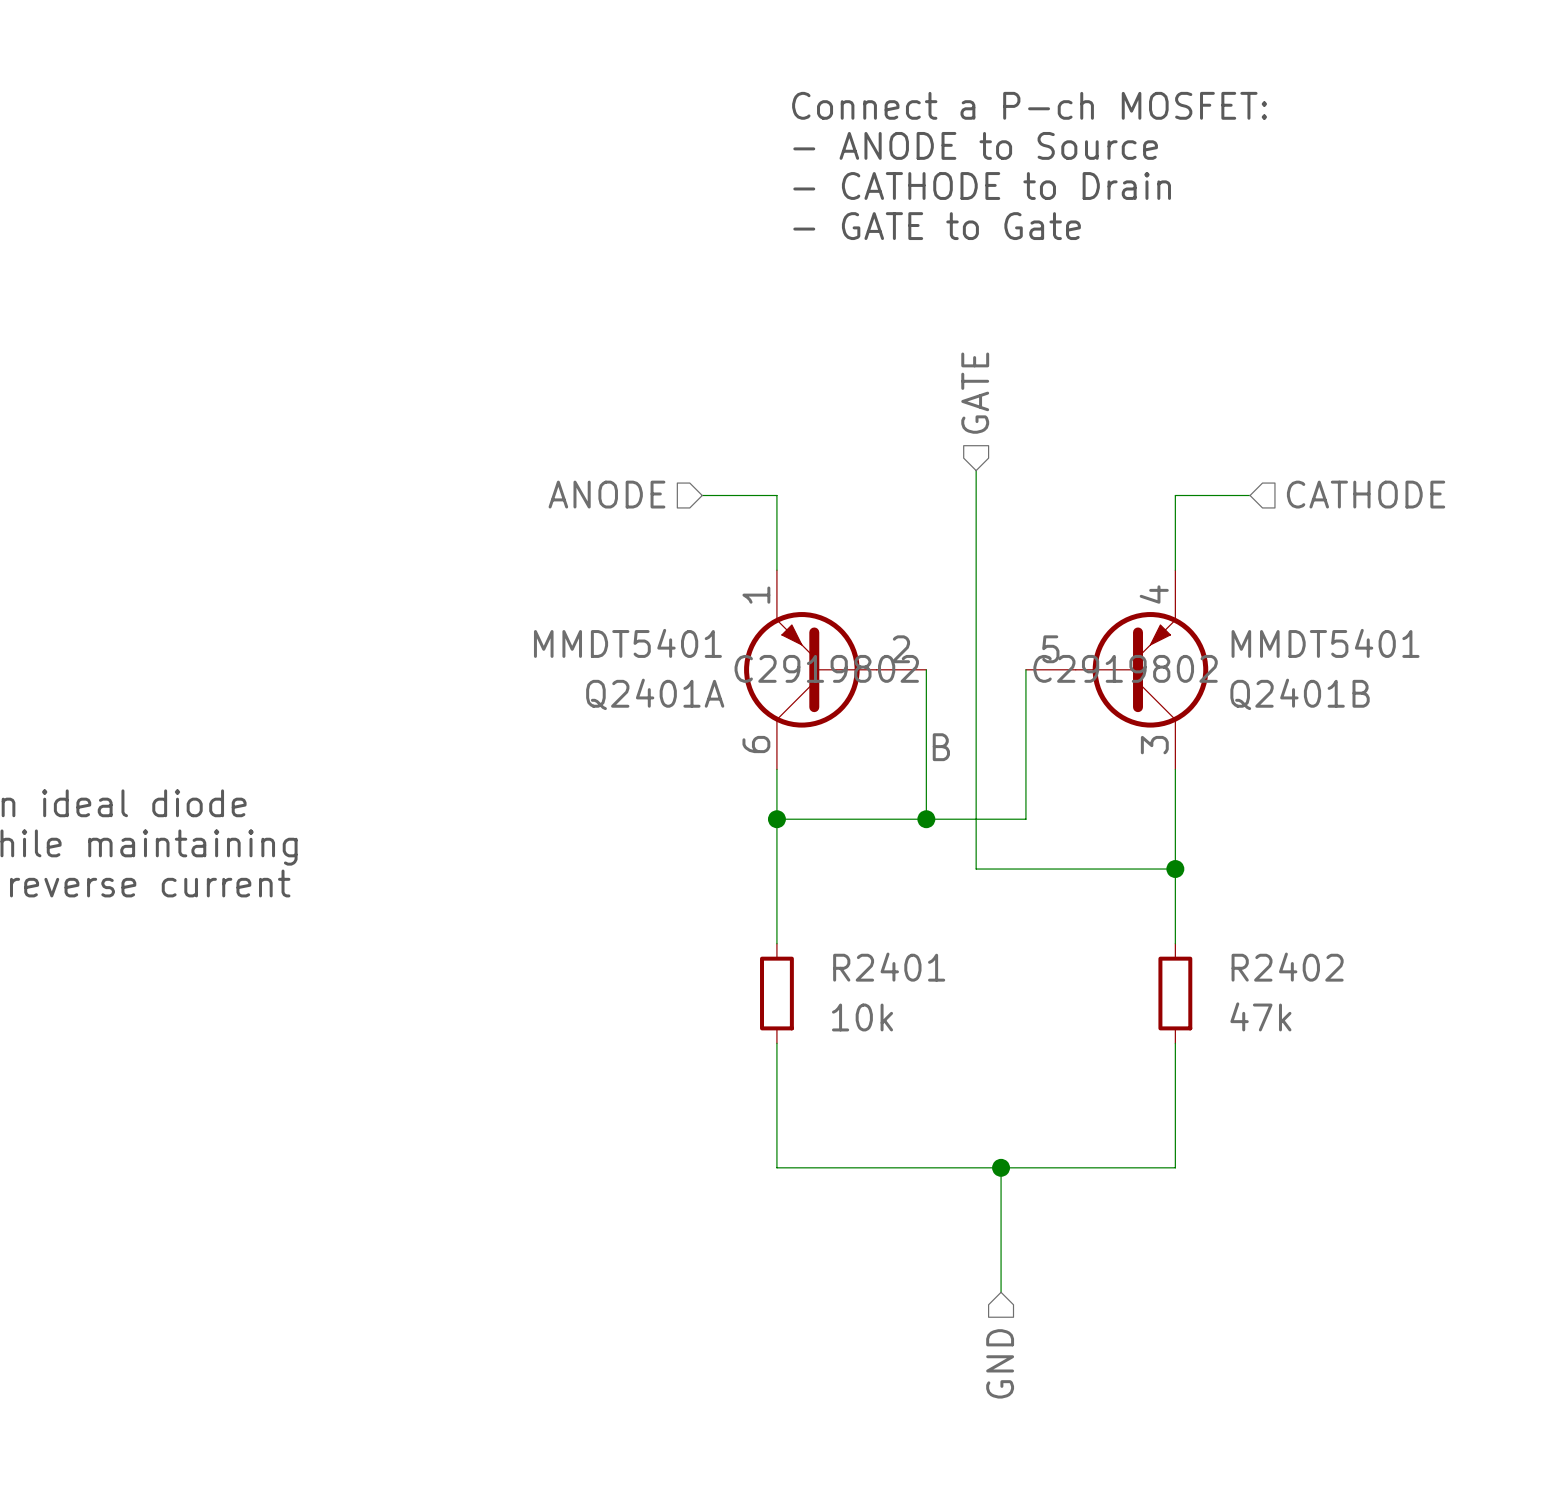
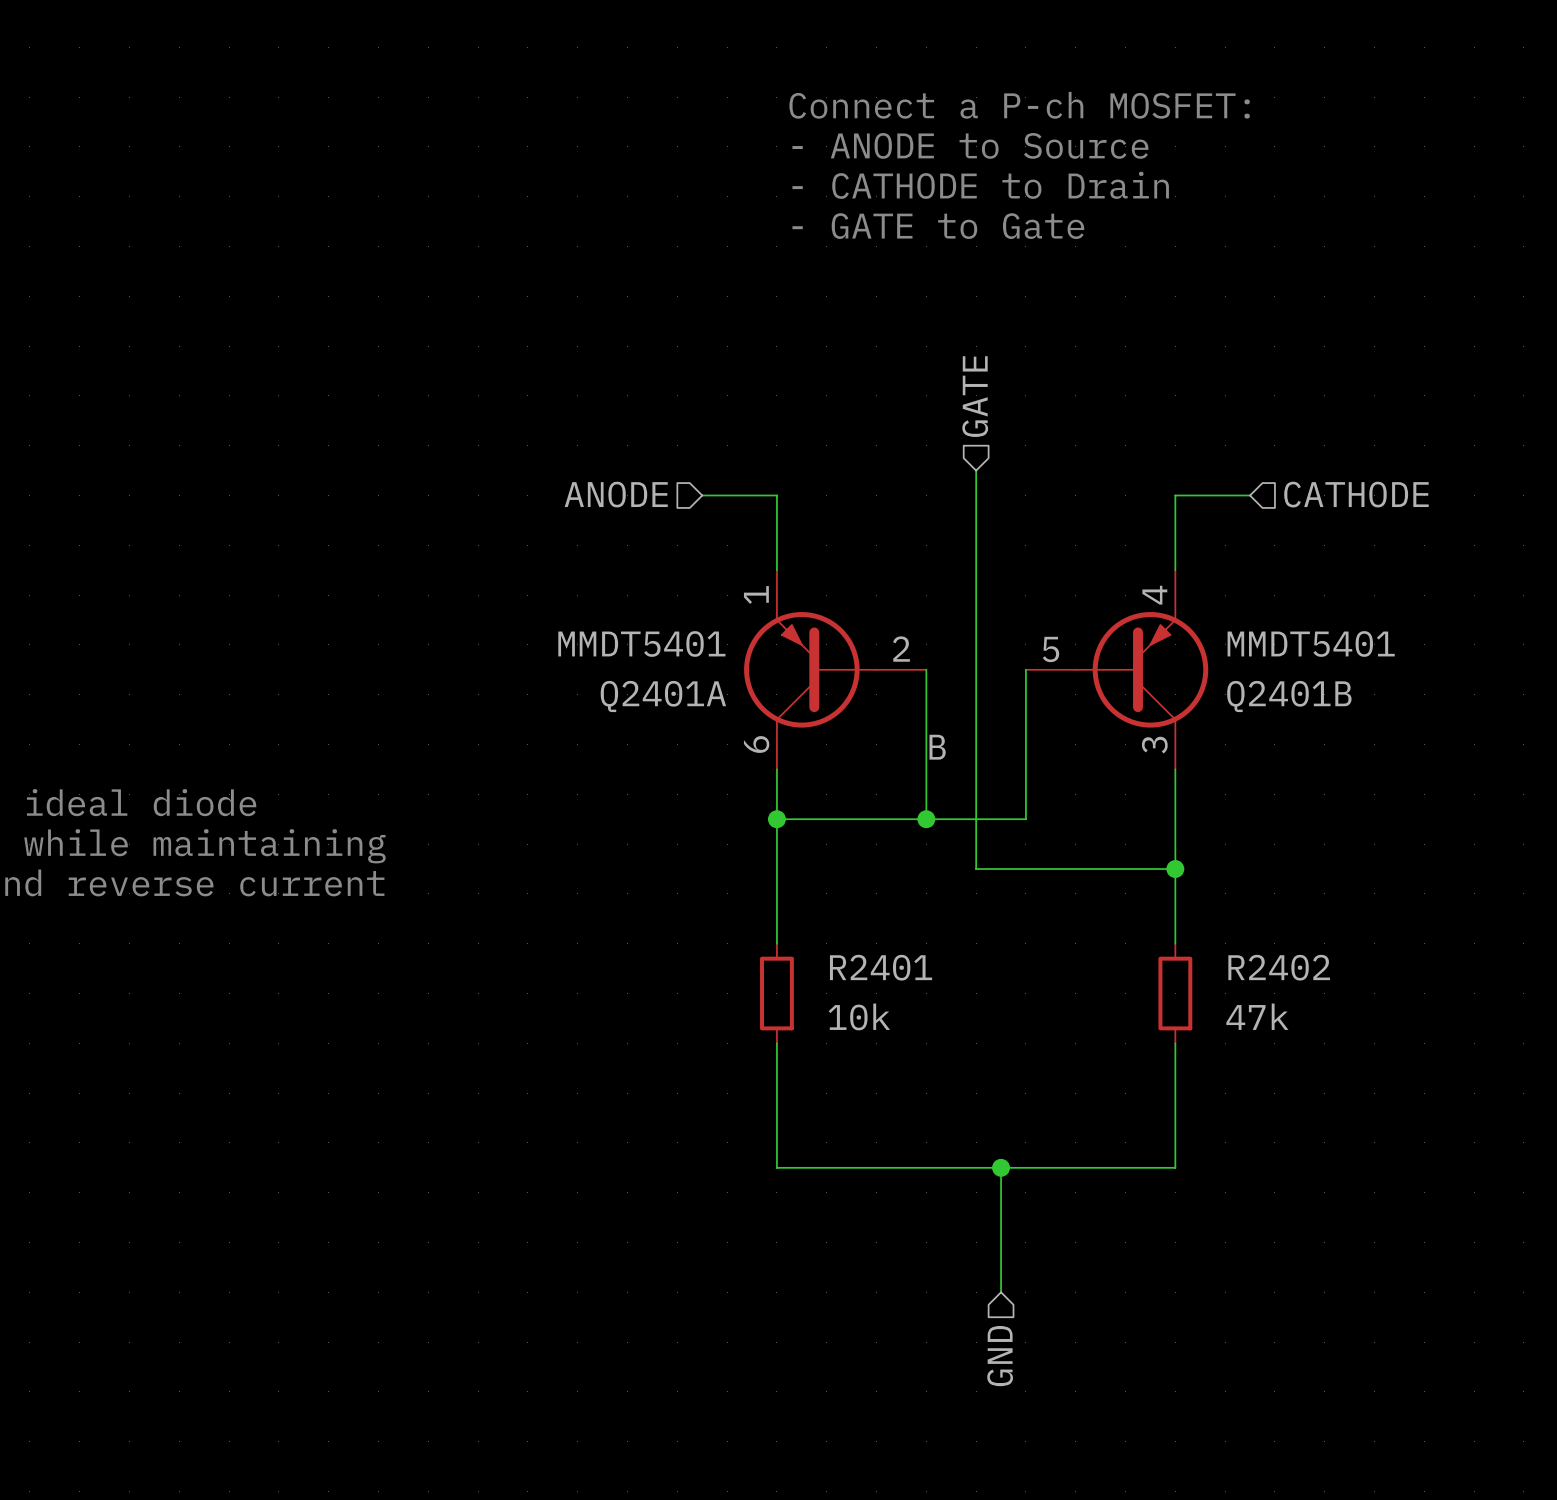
Q2401A text: C2919802 (826, 668) -> none
Q2401B text: C2919802 (1125, 668) -> none

